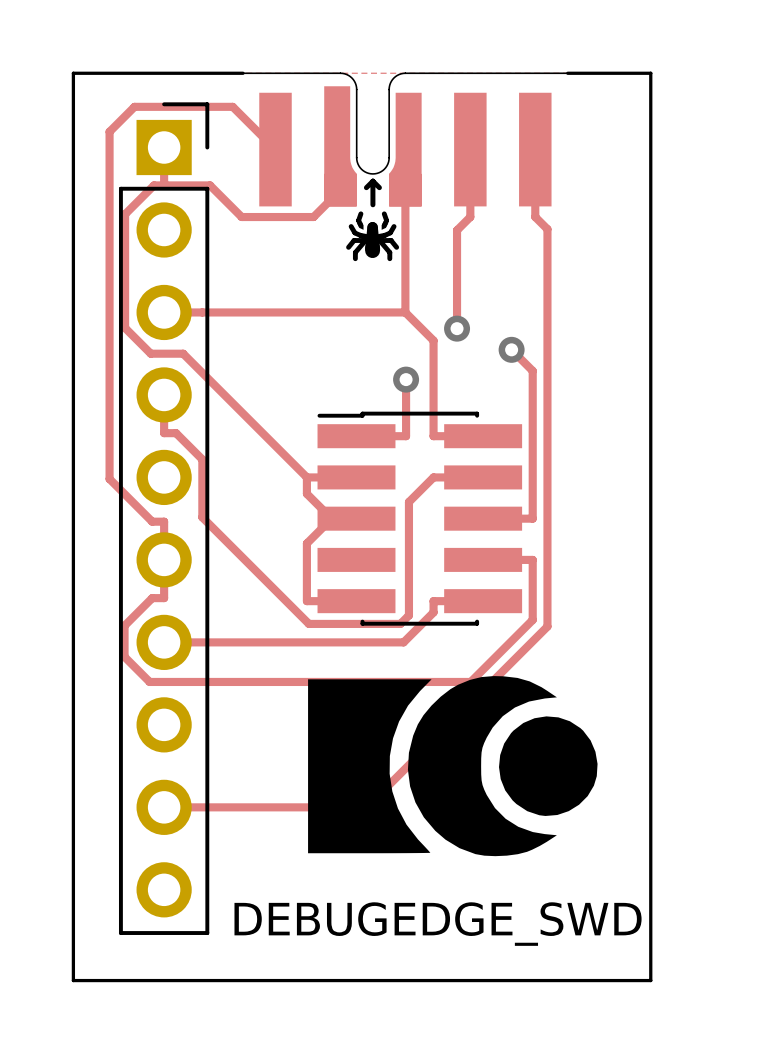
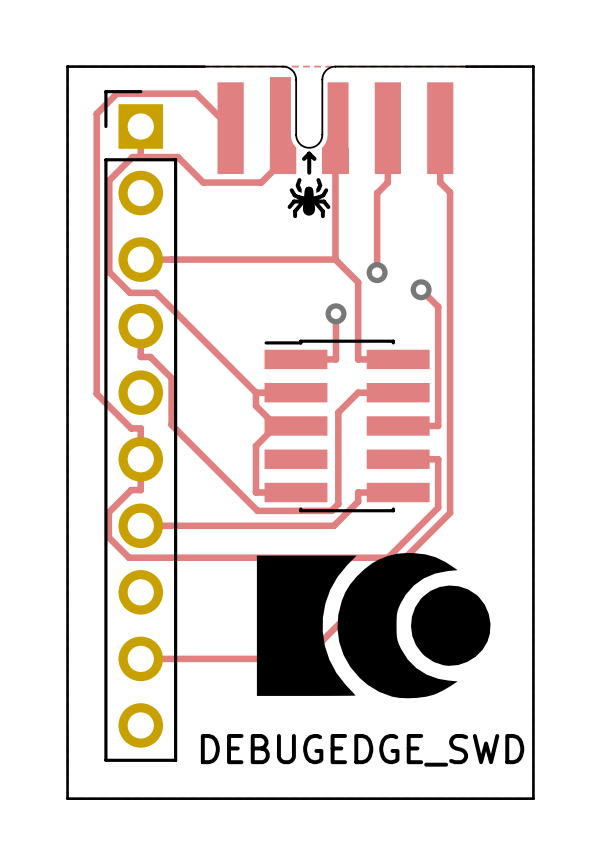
part footprint: [118, 102, 210, 935] -> [104, 90, 178, 762]

